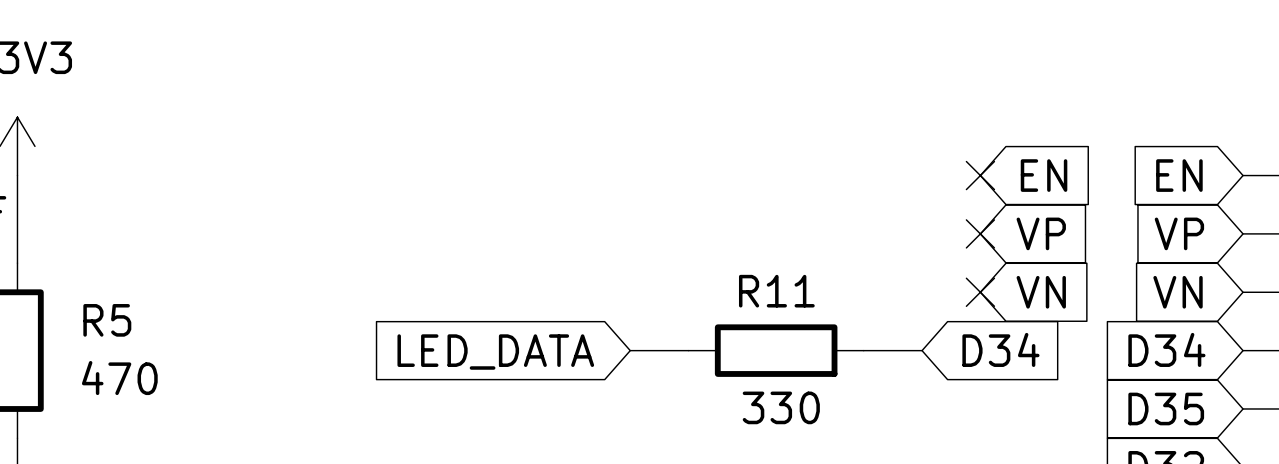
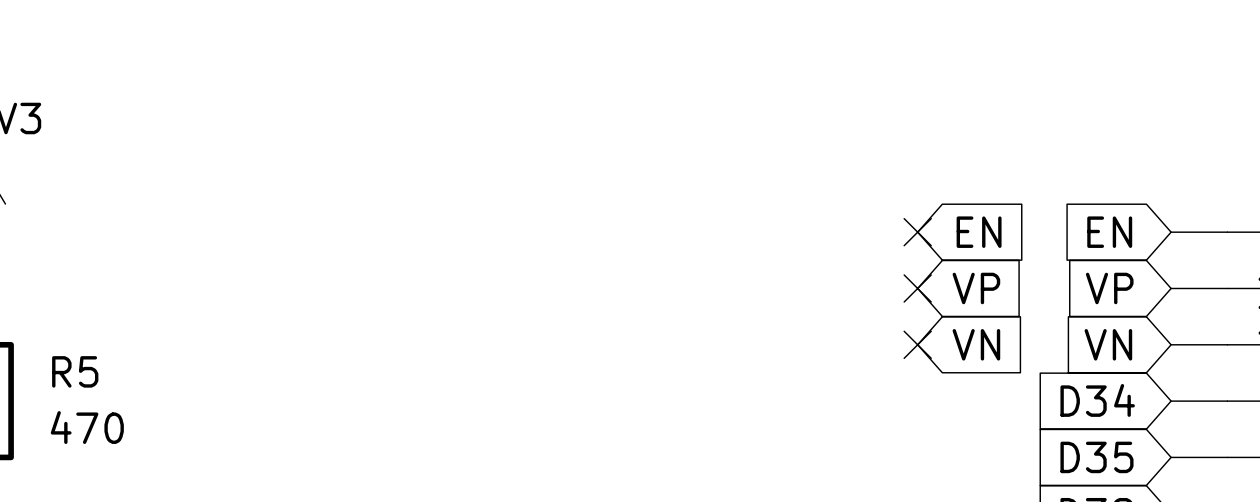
global label: D34 (1000, 349) -> none
wire: (630, 350) (688, 350) -> none
R11: 330 (776, 350) -> none
wire: (863, 350) (922, 350) -> none
global label: LED_DATA (495, 352) -> none

